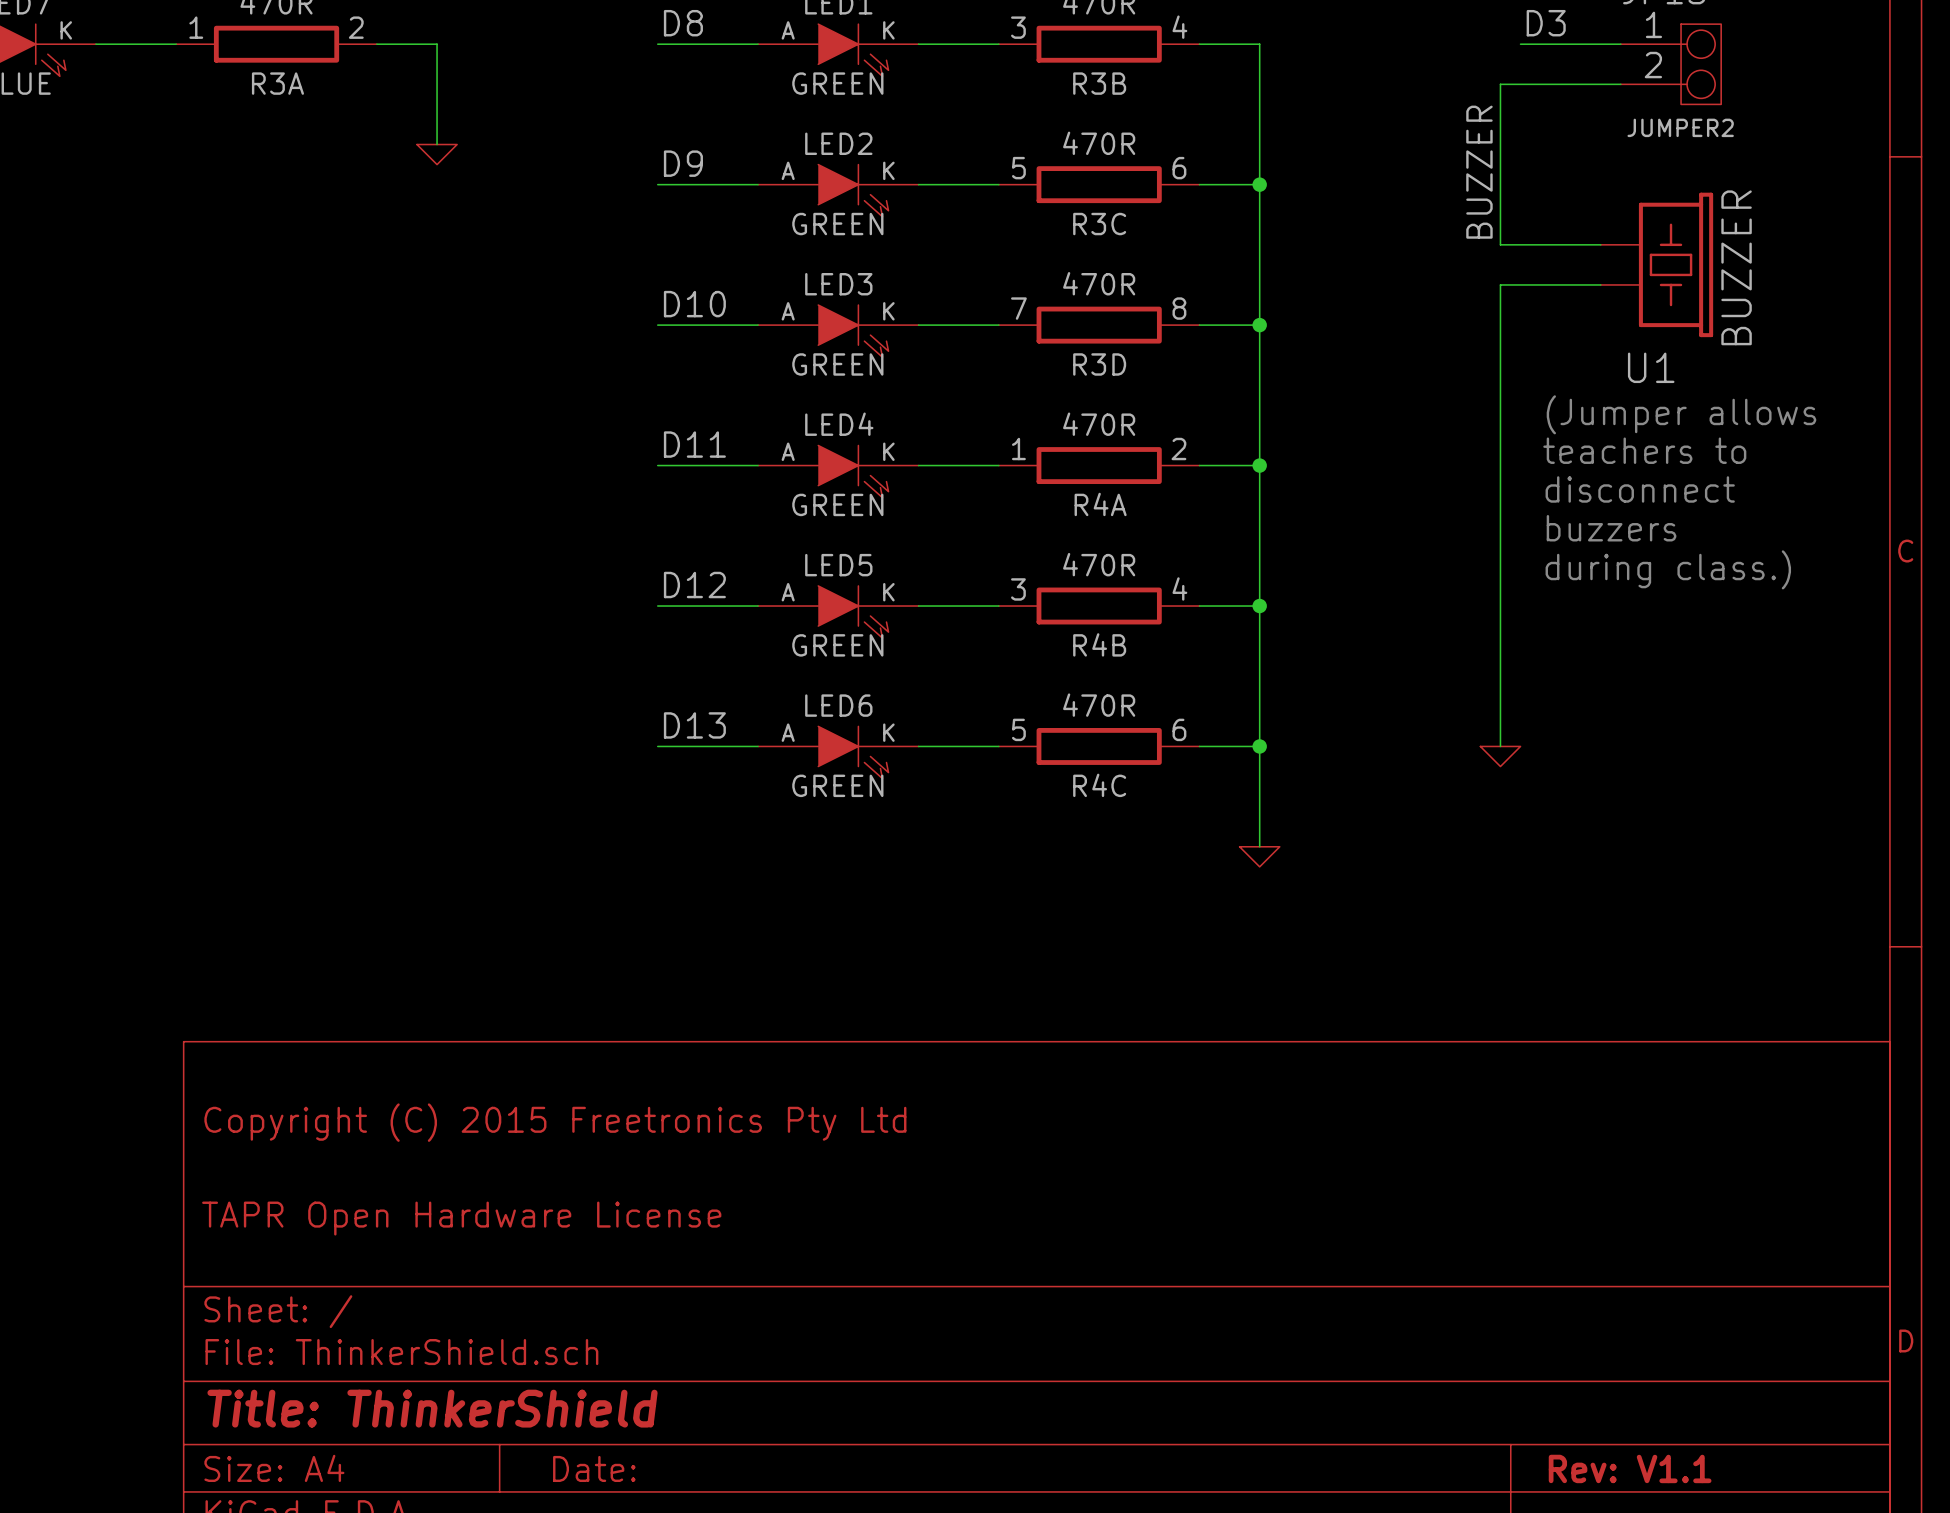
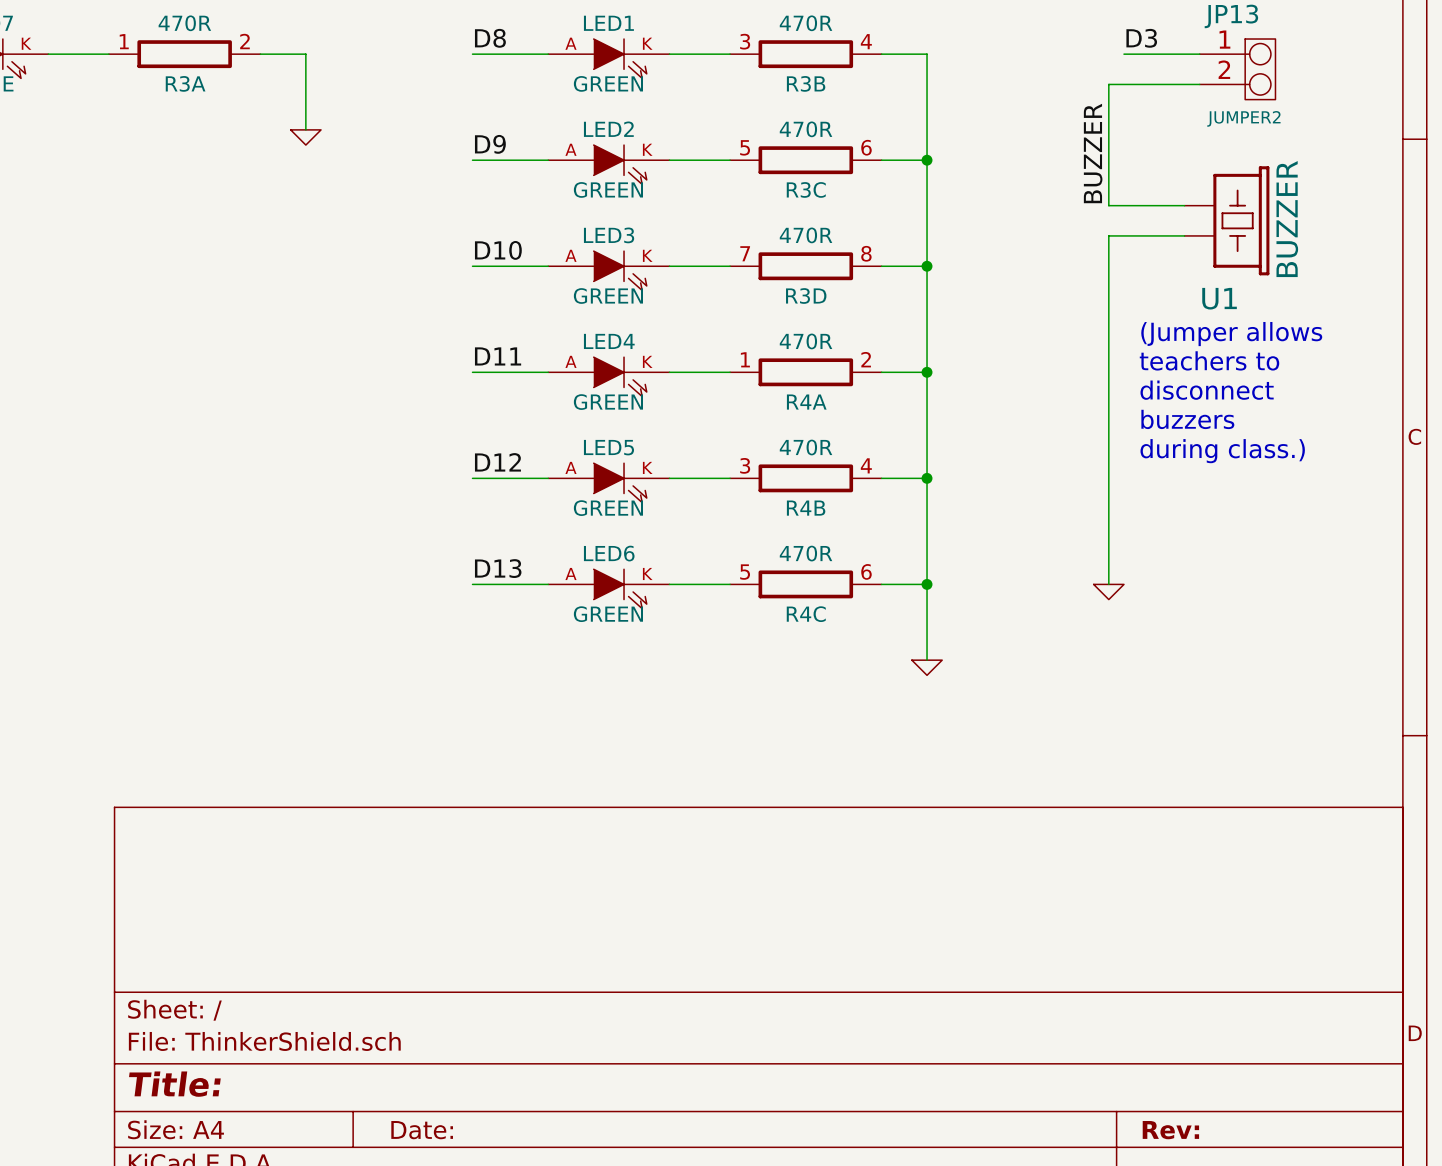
title block: Copyright (C) 2015 Freetronics Pty Ltd (555, 1122) -> none
title block: TAPR Open Hardware License (461, 1218) -> none
title block: Title: ThinkerShield (432, 1408) -> Title: (174, 1084)
title block: Rev: V1.1 (1630, 1468) -> Rev: (1170, 1130)

